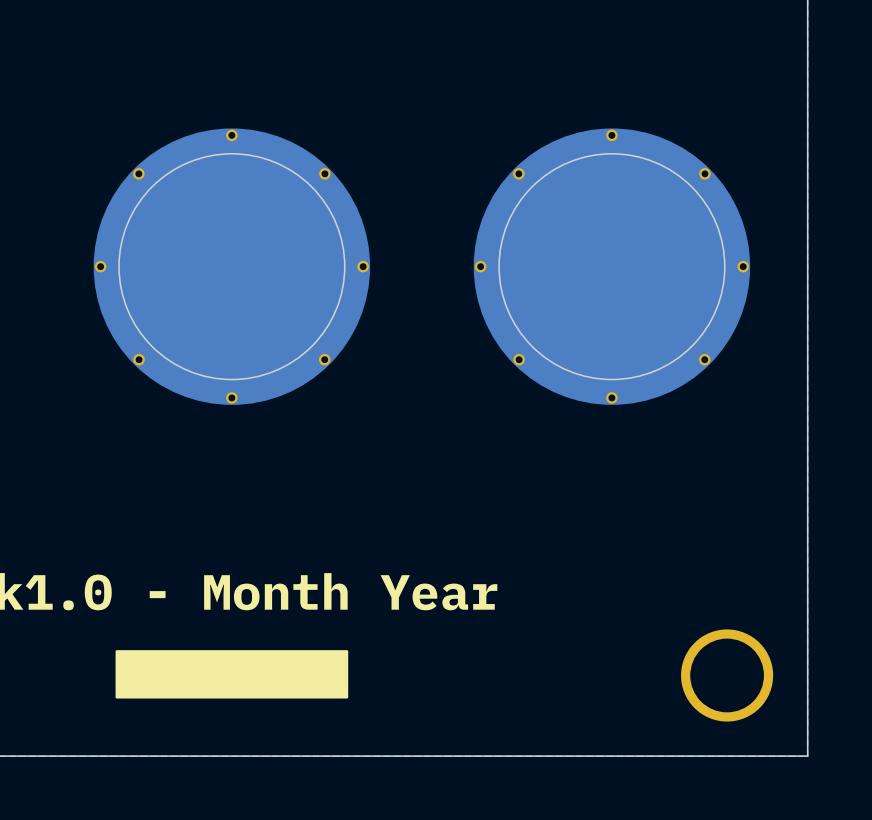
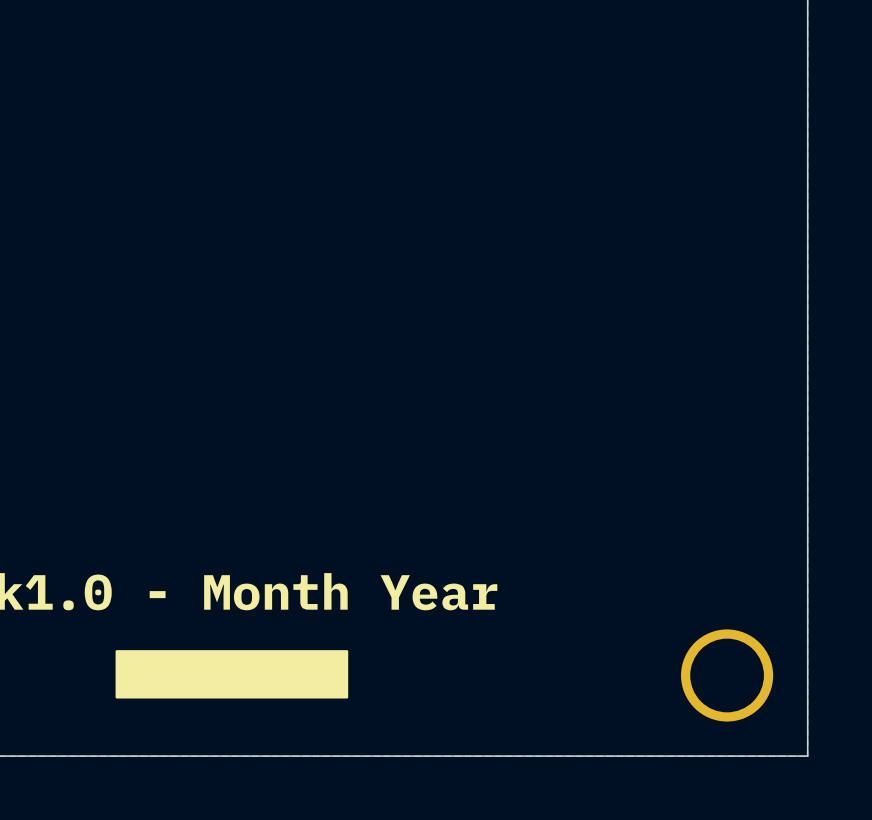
part: (231, 266) -> none
part: (611, 266) -> none

